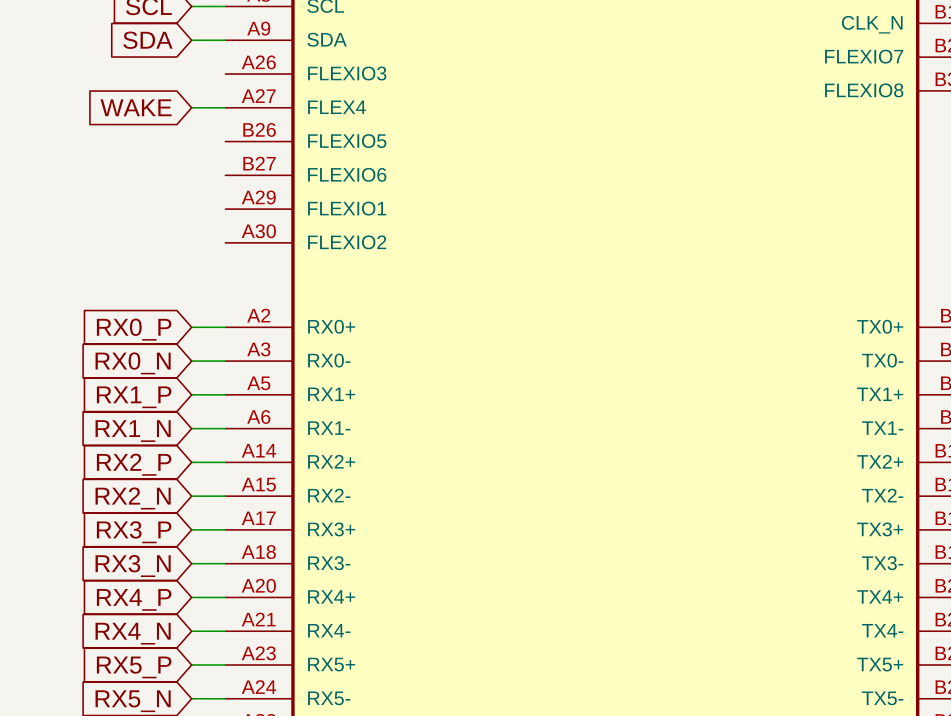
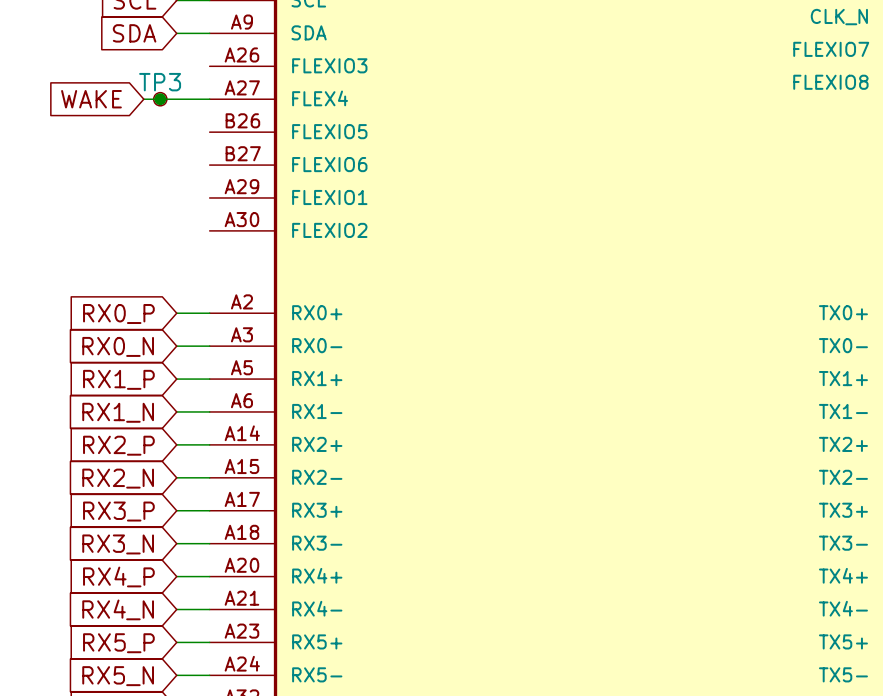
global label position: WAKE (136, 107) -> WAKE (91, 99)
wire: none -> (143, 99) (176, 99)
TP3: none -> (160, 99)
junction: none -> (160, 99)

